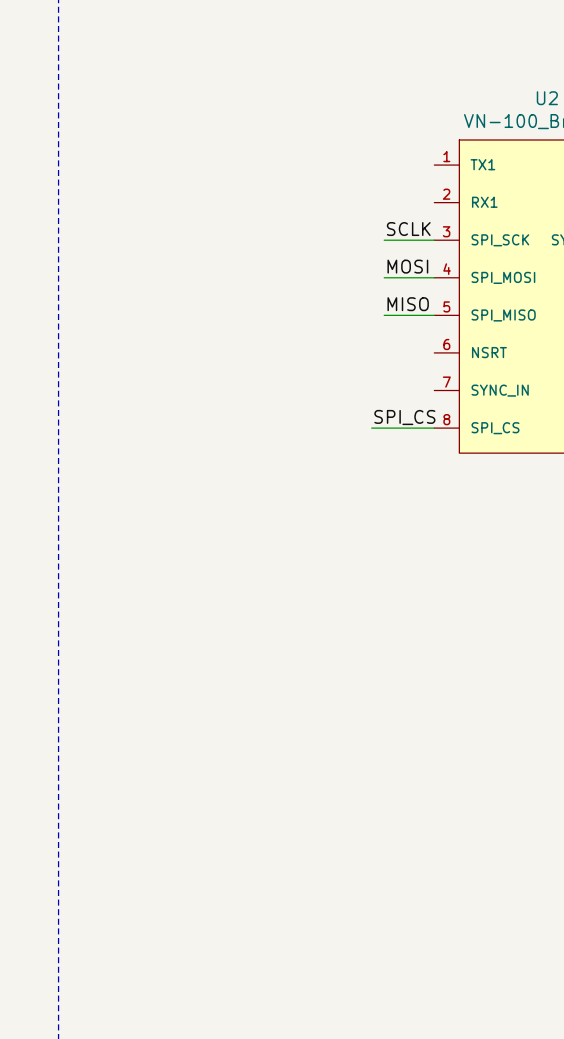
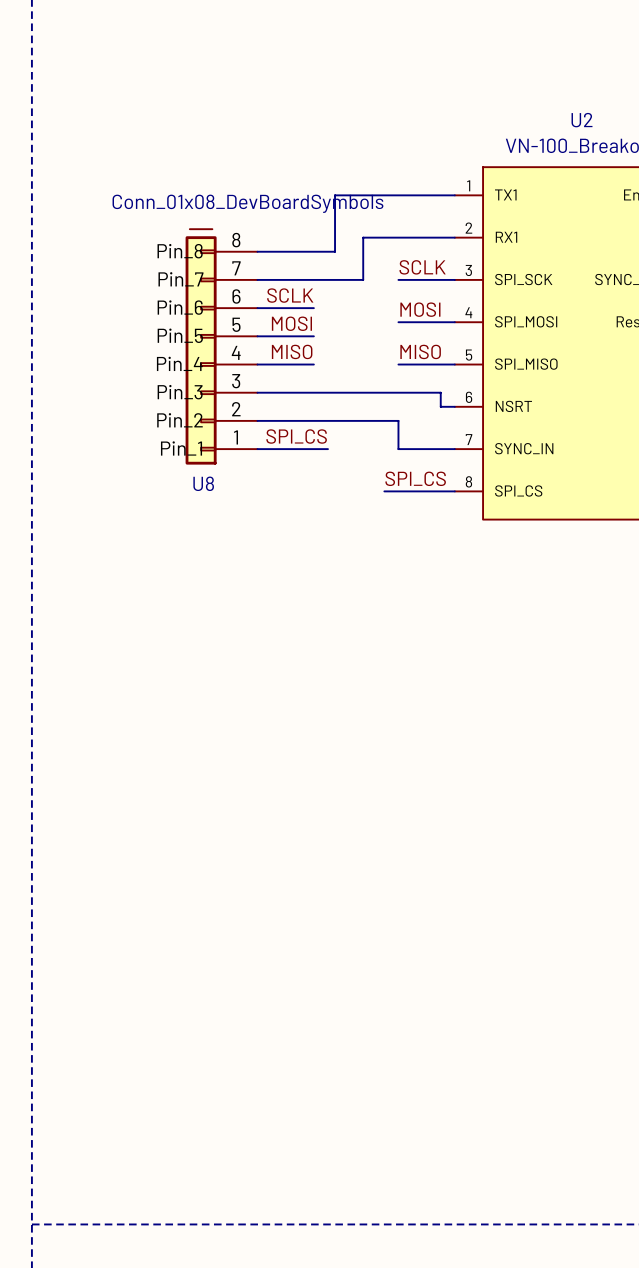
wire: none -> (454, 195) (335, 195) (335, 251) (257, 251)
wire: none -> (454, 237) (363, 237) (363, 279) (257, 279)
label: none -> SCLK (290, 295)
wire: none -> (257, 308) (313, 308)
label: none -> MOSI (291, 323)
wire: none -> (257, 336) (313, 336)
U8: none -> Conn_01x08_DevBoardSymbols (221, 346)
label: none -> MISO (292, 351)
wire: none -> (257, 364) (313, 364)
wire: none -> (257, 392) (440, 392) (440, 406) (454, 406)
wire: none -> (257, 420) (398, 420) (398, 449) (454, 449)
label: none -> SPI_CS (296, 436)
wire: none -> (257, 449) (327, 449)

